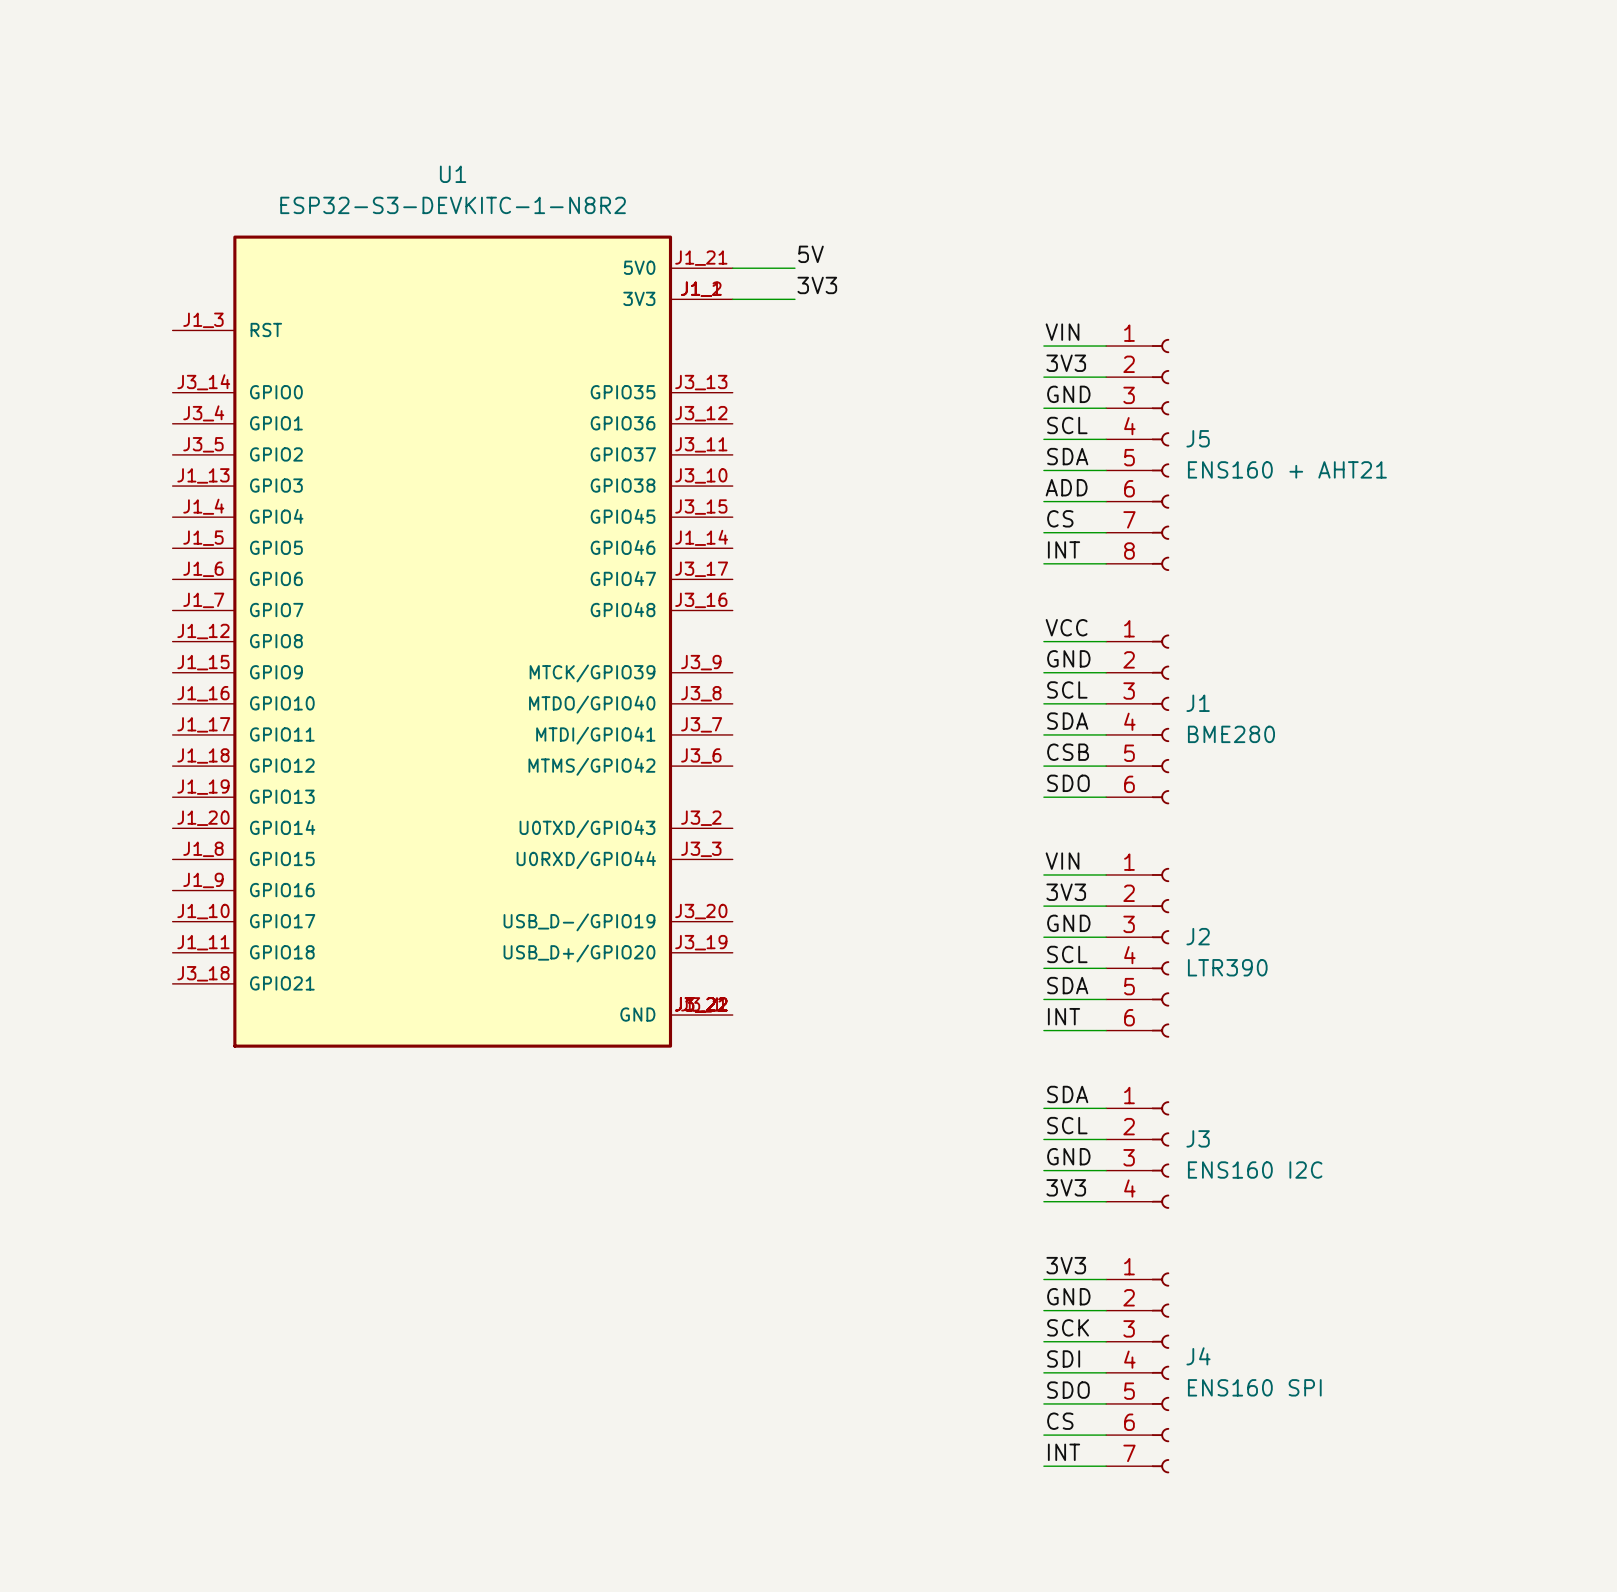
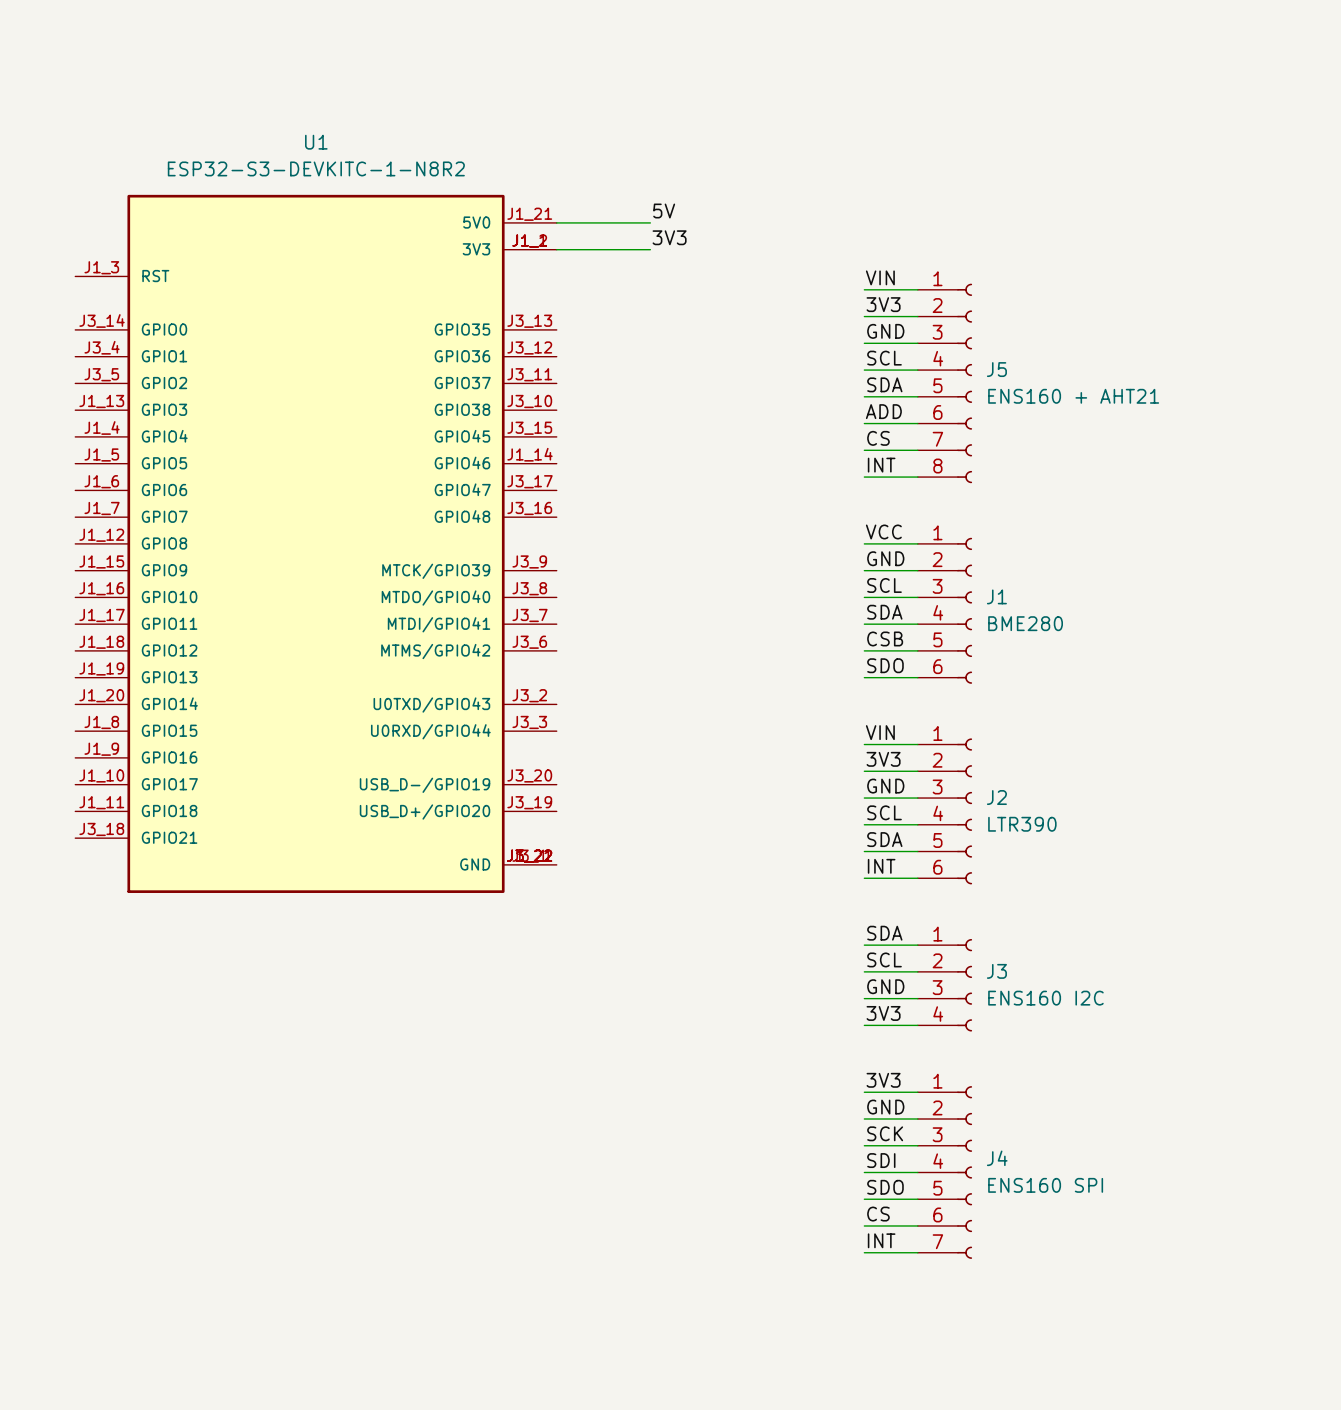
U1 position: (452, 641) -> (316, 543)

